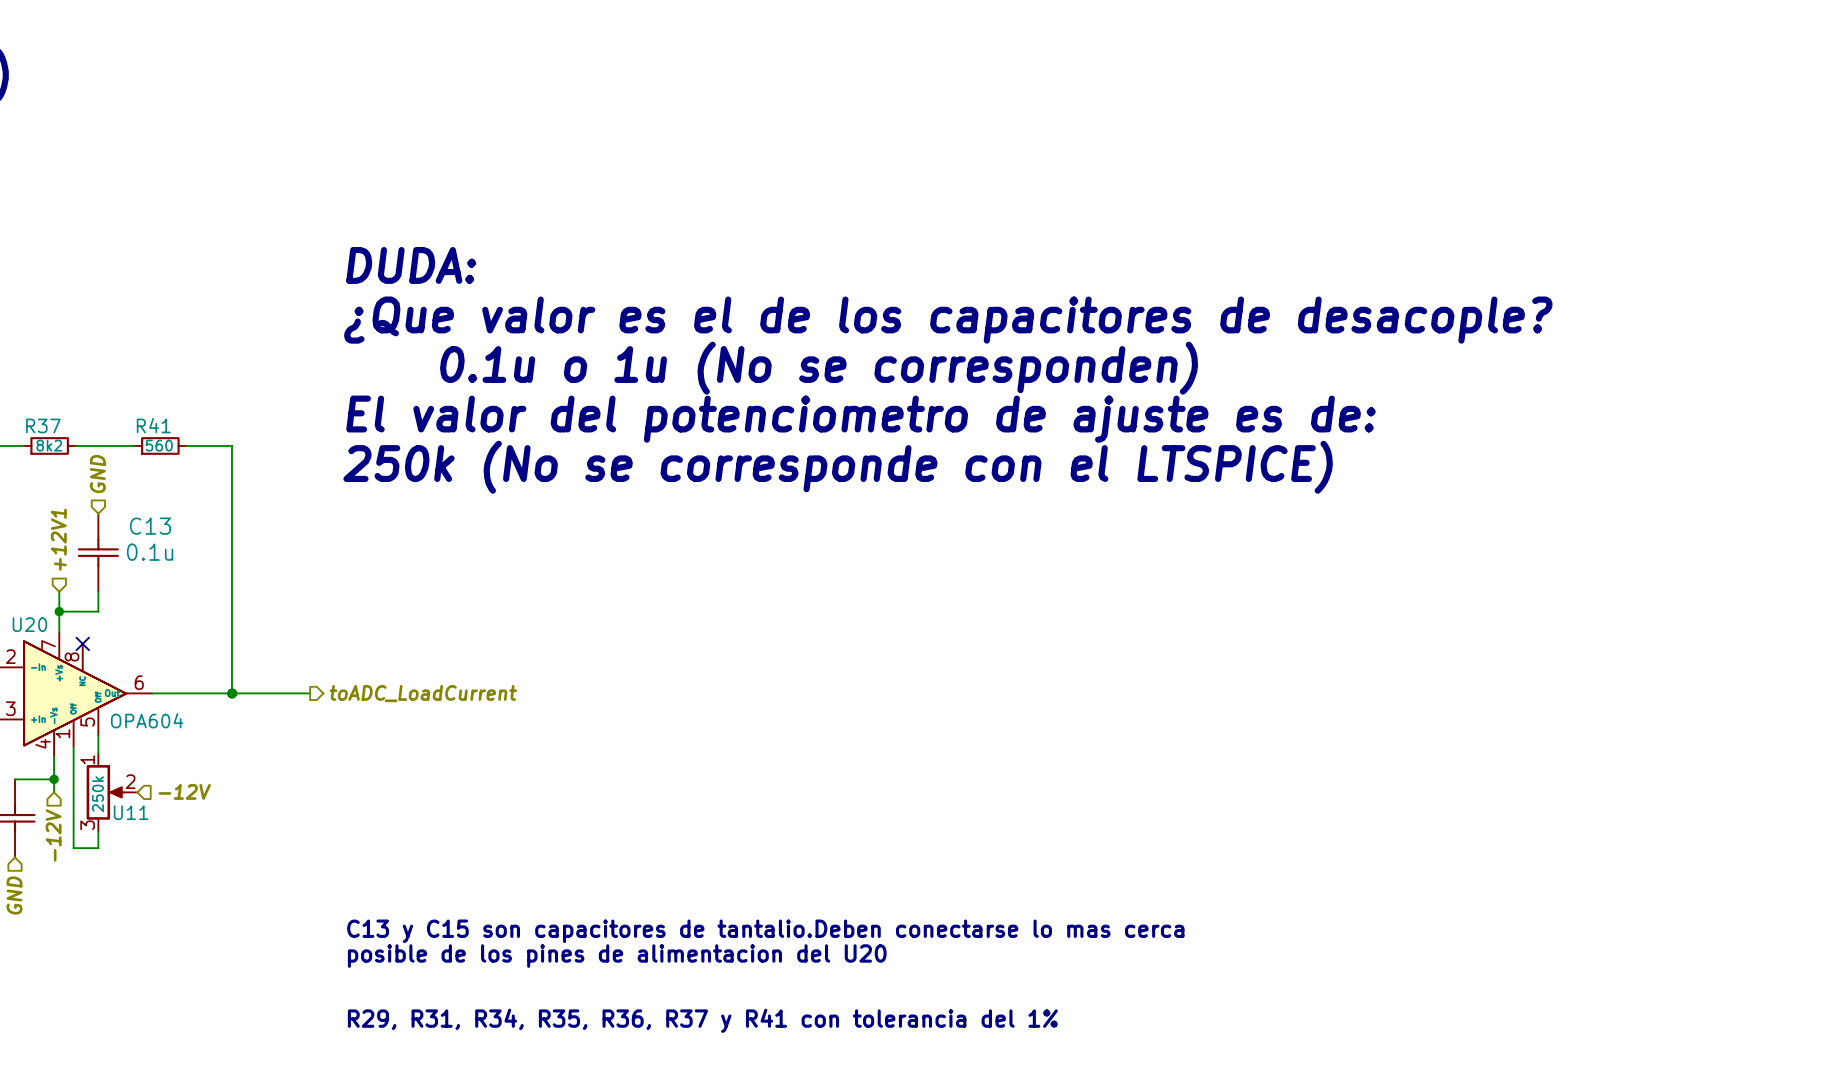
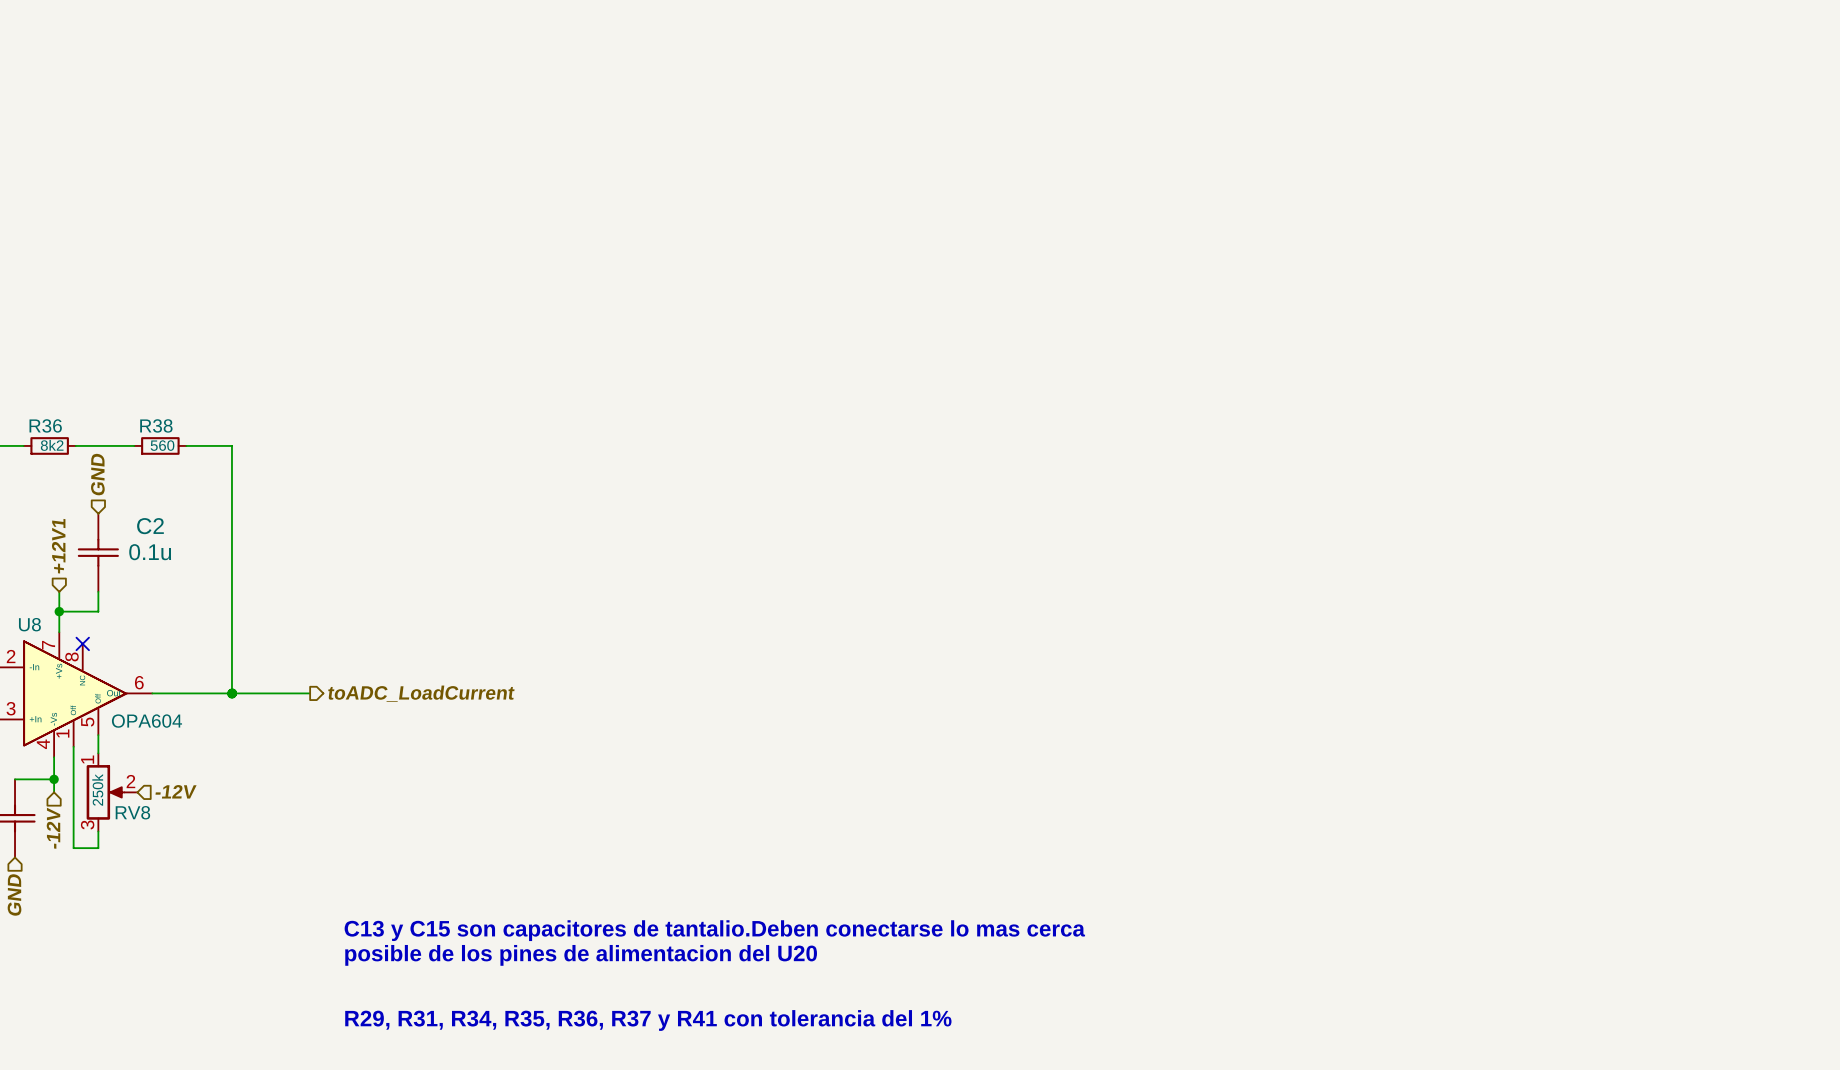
text: DUDA: (411, 265) -> none
text: ¿Que valor es el de los capacitores de desacople? (948, 320) -> none
text: 0.1u o 1u (No se corresponden) (819, 368) -> none
text: El valor del potenciometro de ajuste es de: (861, 419) -> none
R37 name: R37 (43, 425) -> R36 (45, 425)
R41 name: R41 (153, 425) -> R38 (156, 425)
text: 250k (No se corresponde con el LTSPICE) (838, 467) -> none
C13 name: C13 (150, 526) -> C2 (150, 526)
U20 name: U20 (29, 624) -> U8 (29, 624)
U11 name: U11 (131, 812) -> RV8 (132, 812)

